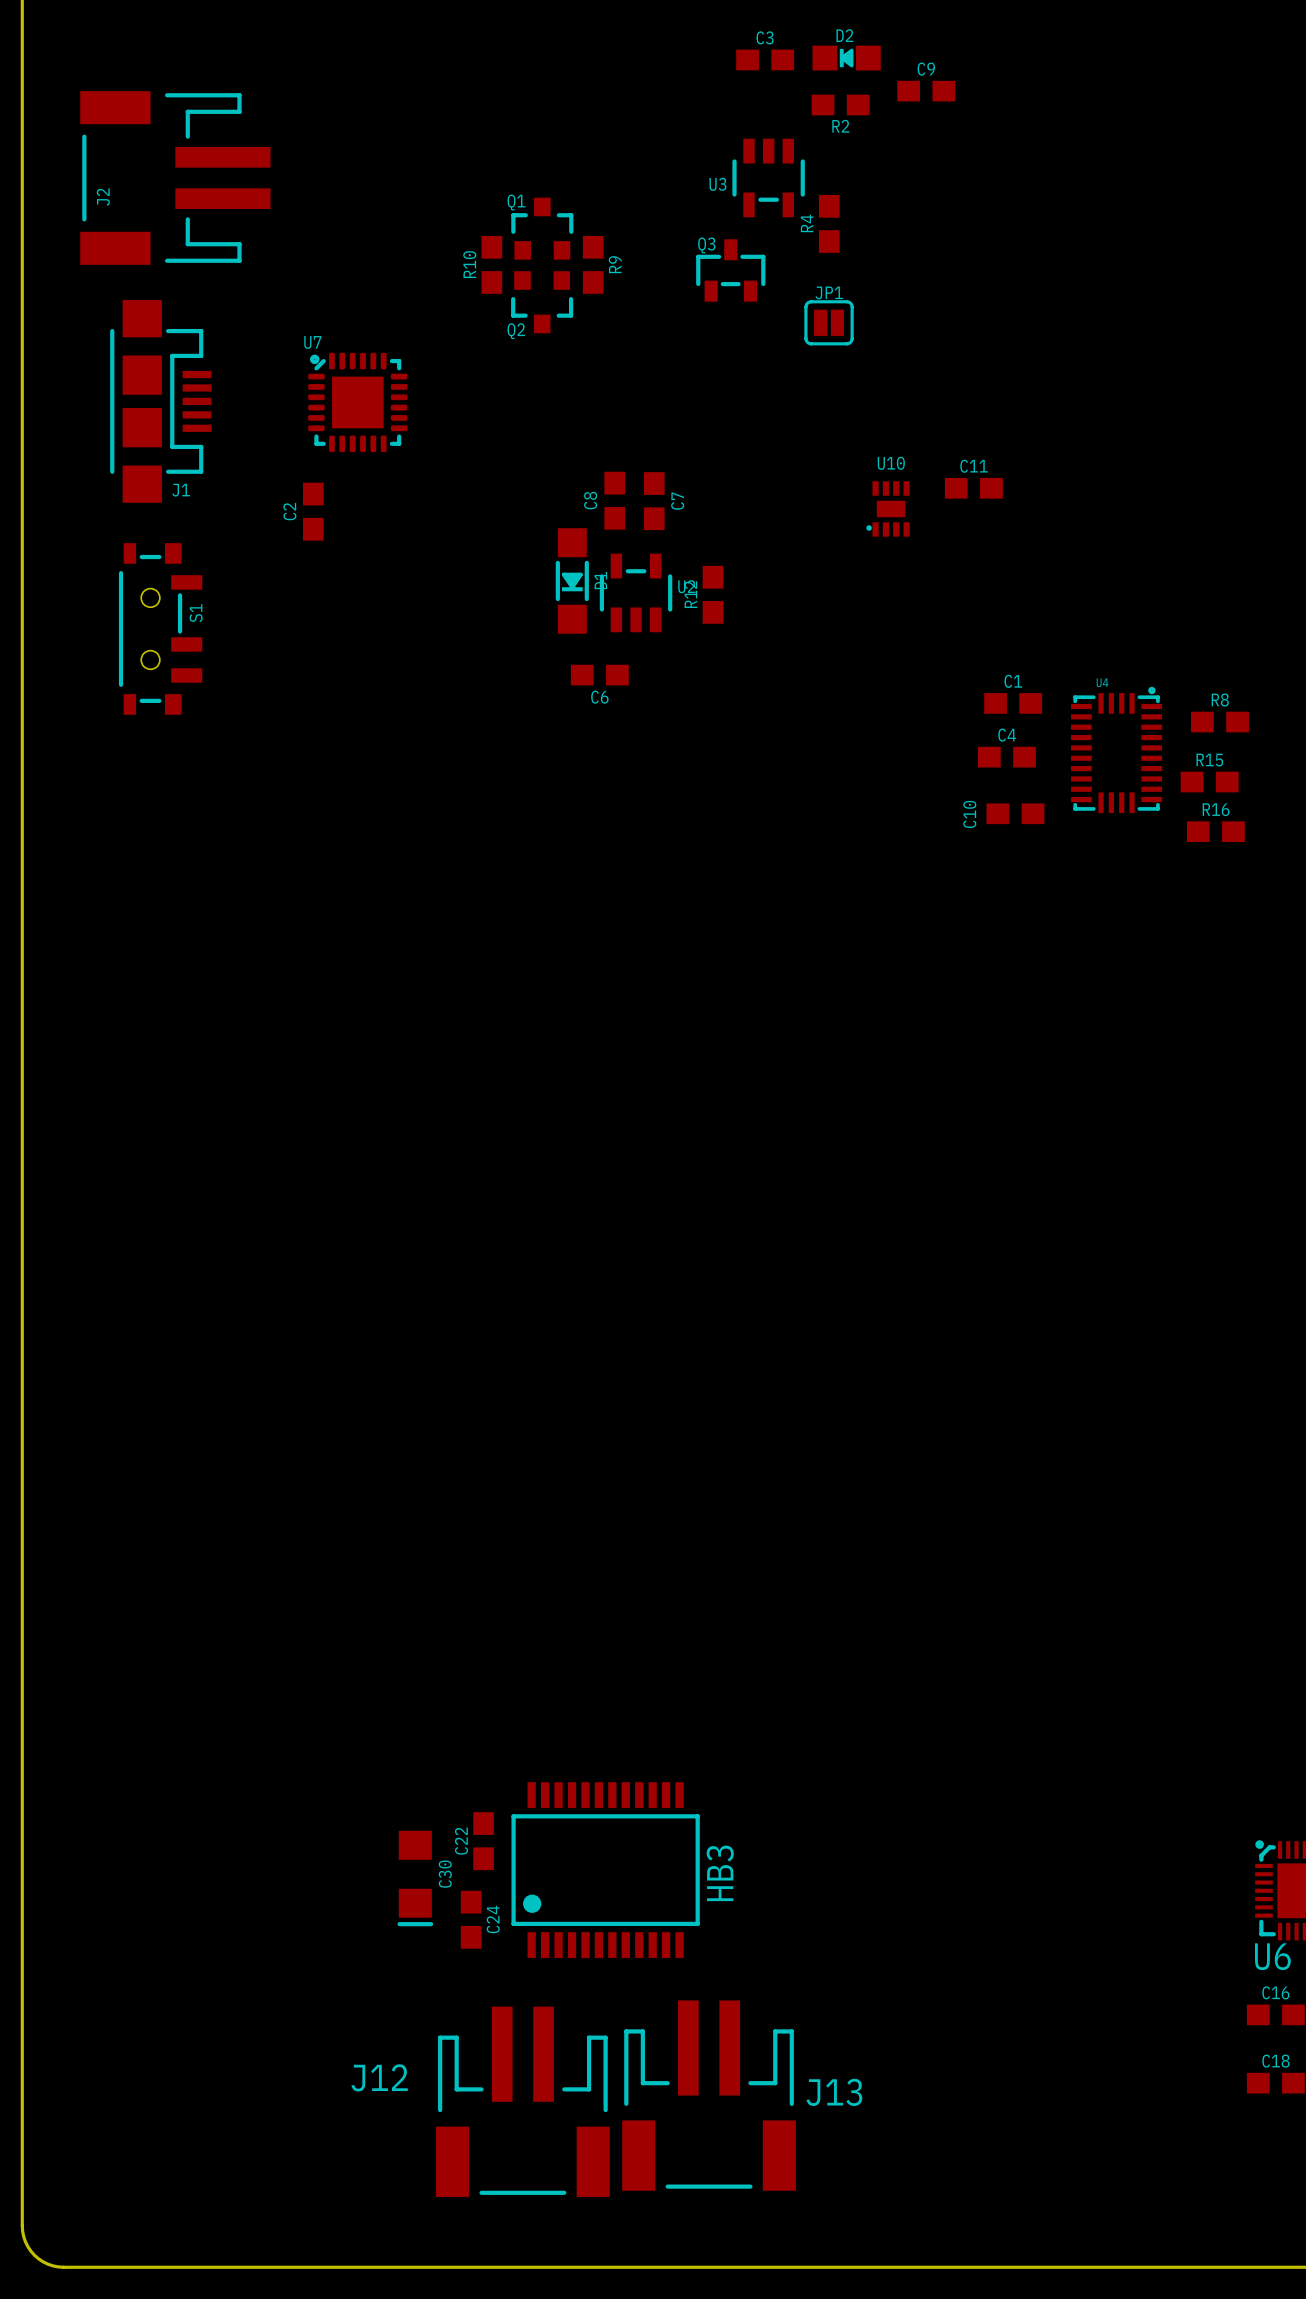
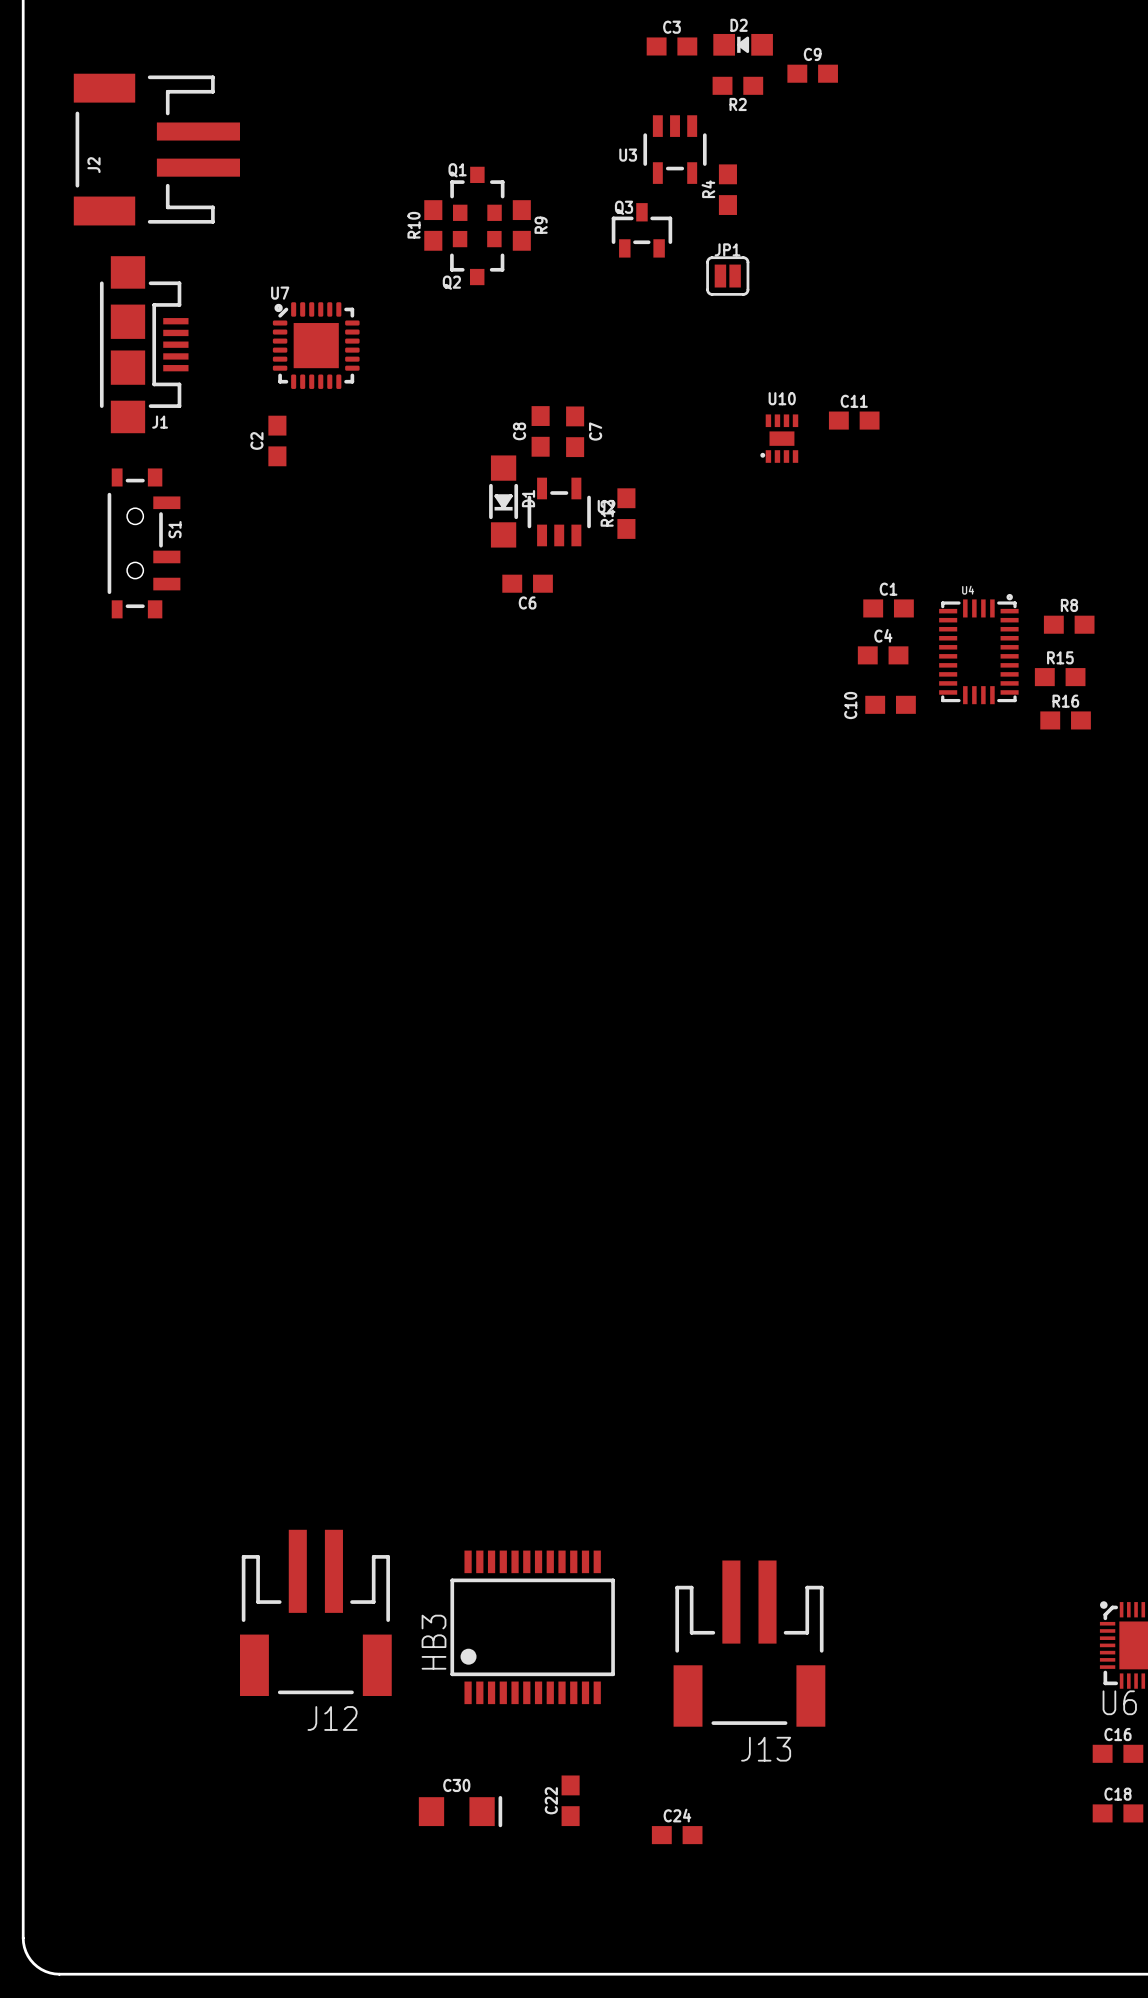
C22 position: (483, 1841) -> (570, 1800)
HB3 name position: HB3 (720, 1873) -> HB3 (434, 1642)
C30 rotation: 0° (415, 1878) -> 90° counterclockwise (460, 1811)
C30 position: (415, 1878) -> (460, 1811)
C24 rotation: 0° (471, 1919) -> 90° clockwise (677, 1835)
C24 position: (471, 1919) -> (677, 1835)
J12 name position: J12 (379, 2077) -> J12 (332, 1718)
J13 name position: J13 (834, 2092) -> J13 (766, 1749)
J13 position: (709, 2095) -> (749, 1643)
J12 position: (522, 2101) -> (315, 1612)

